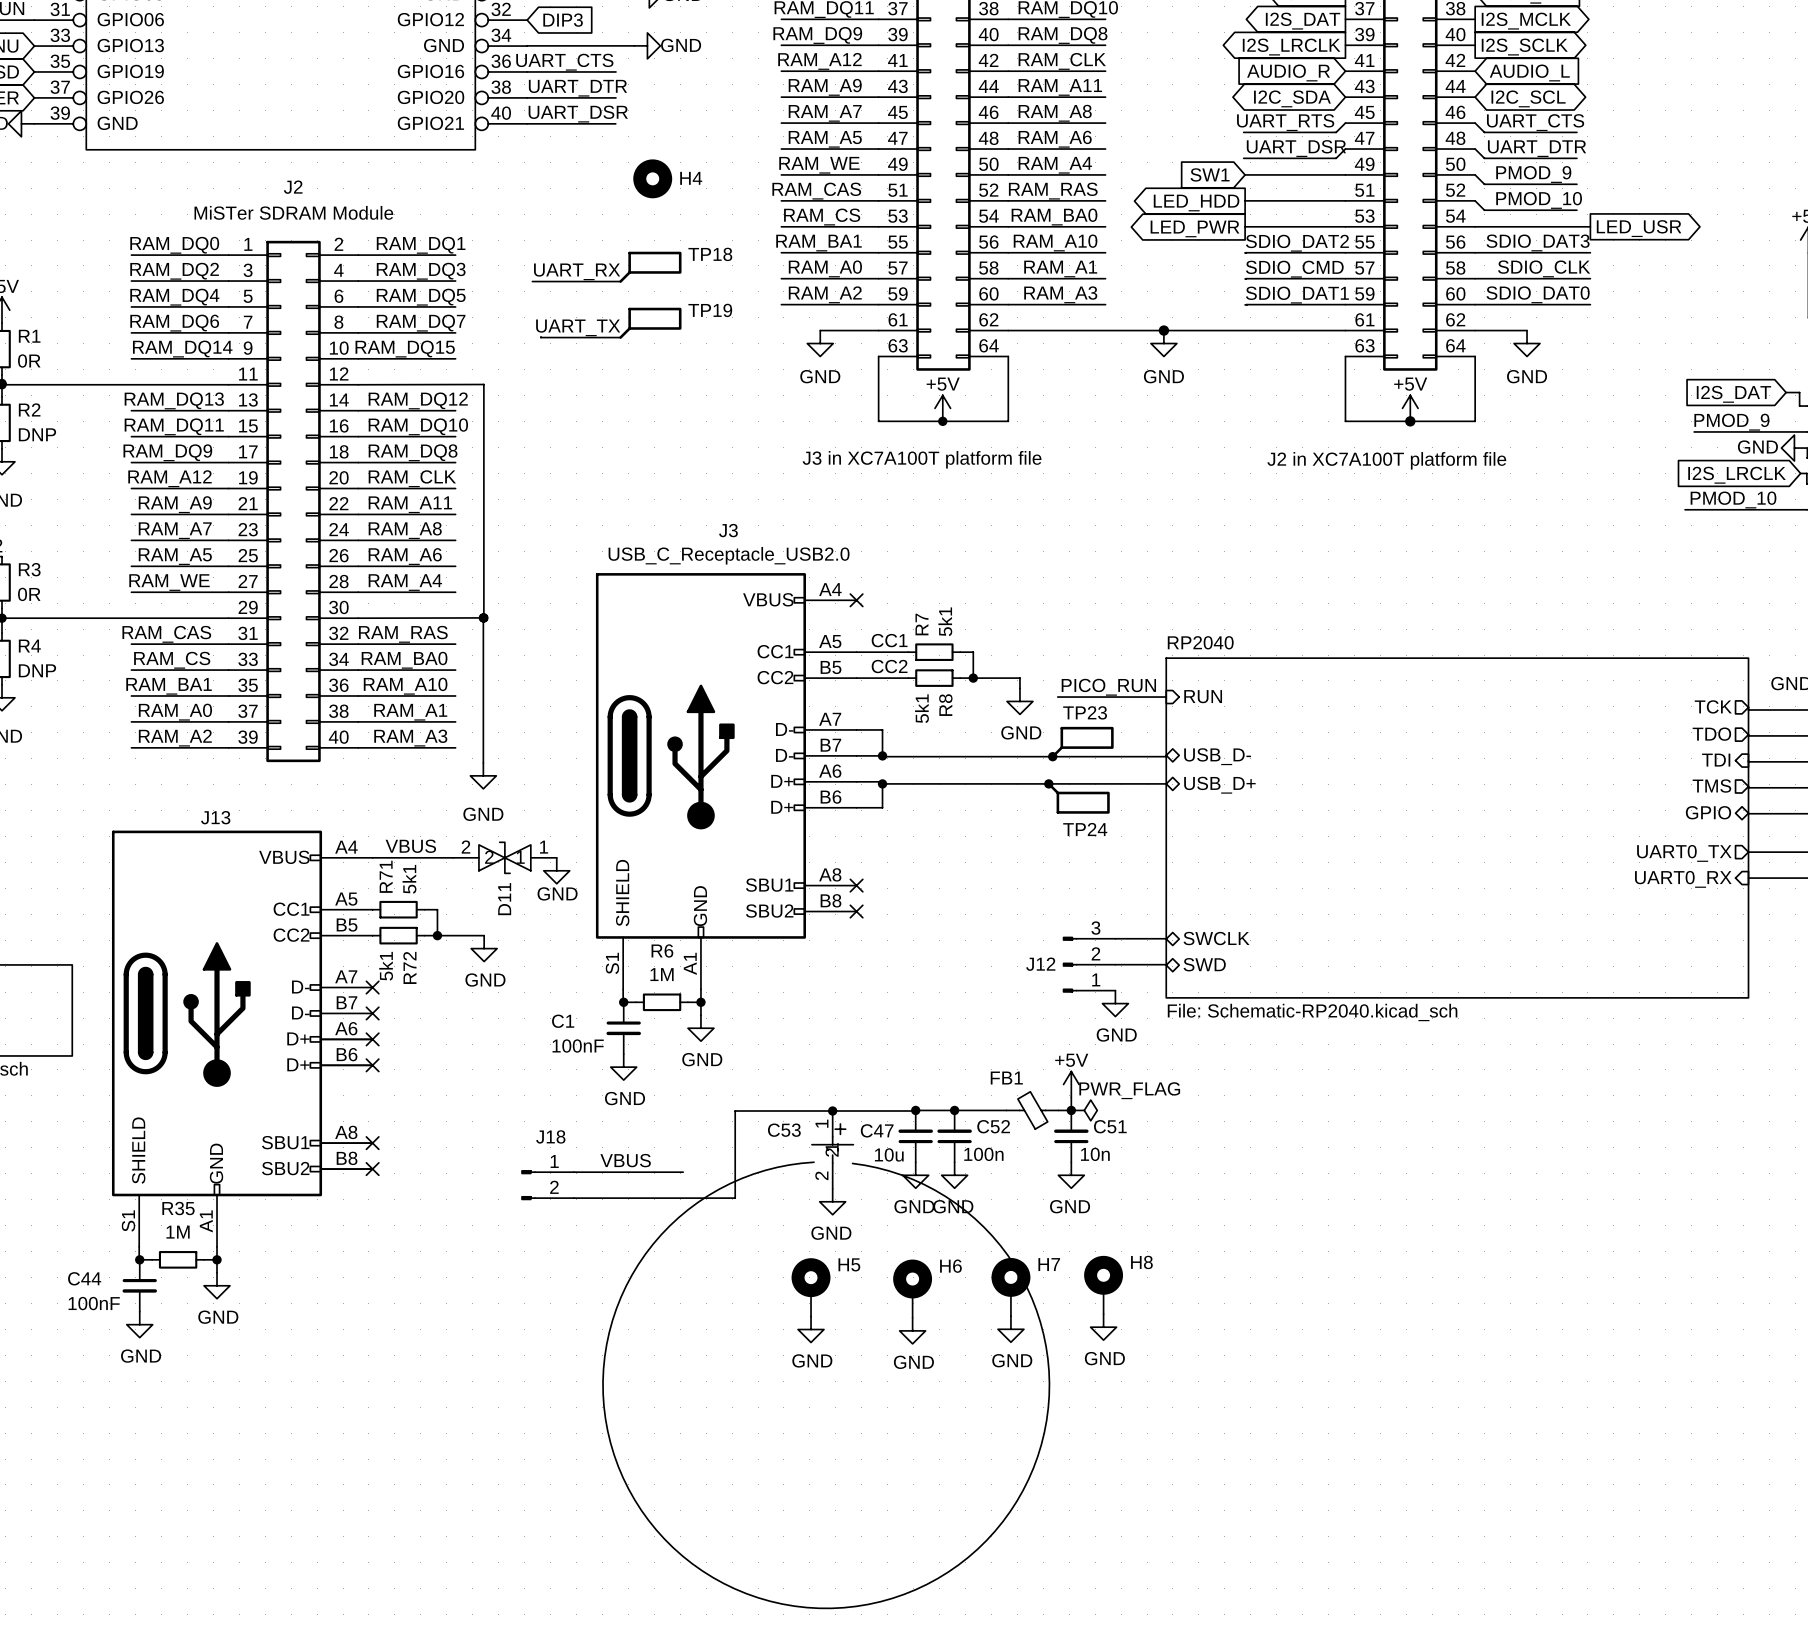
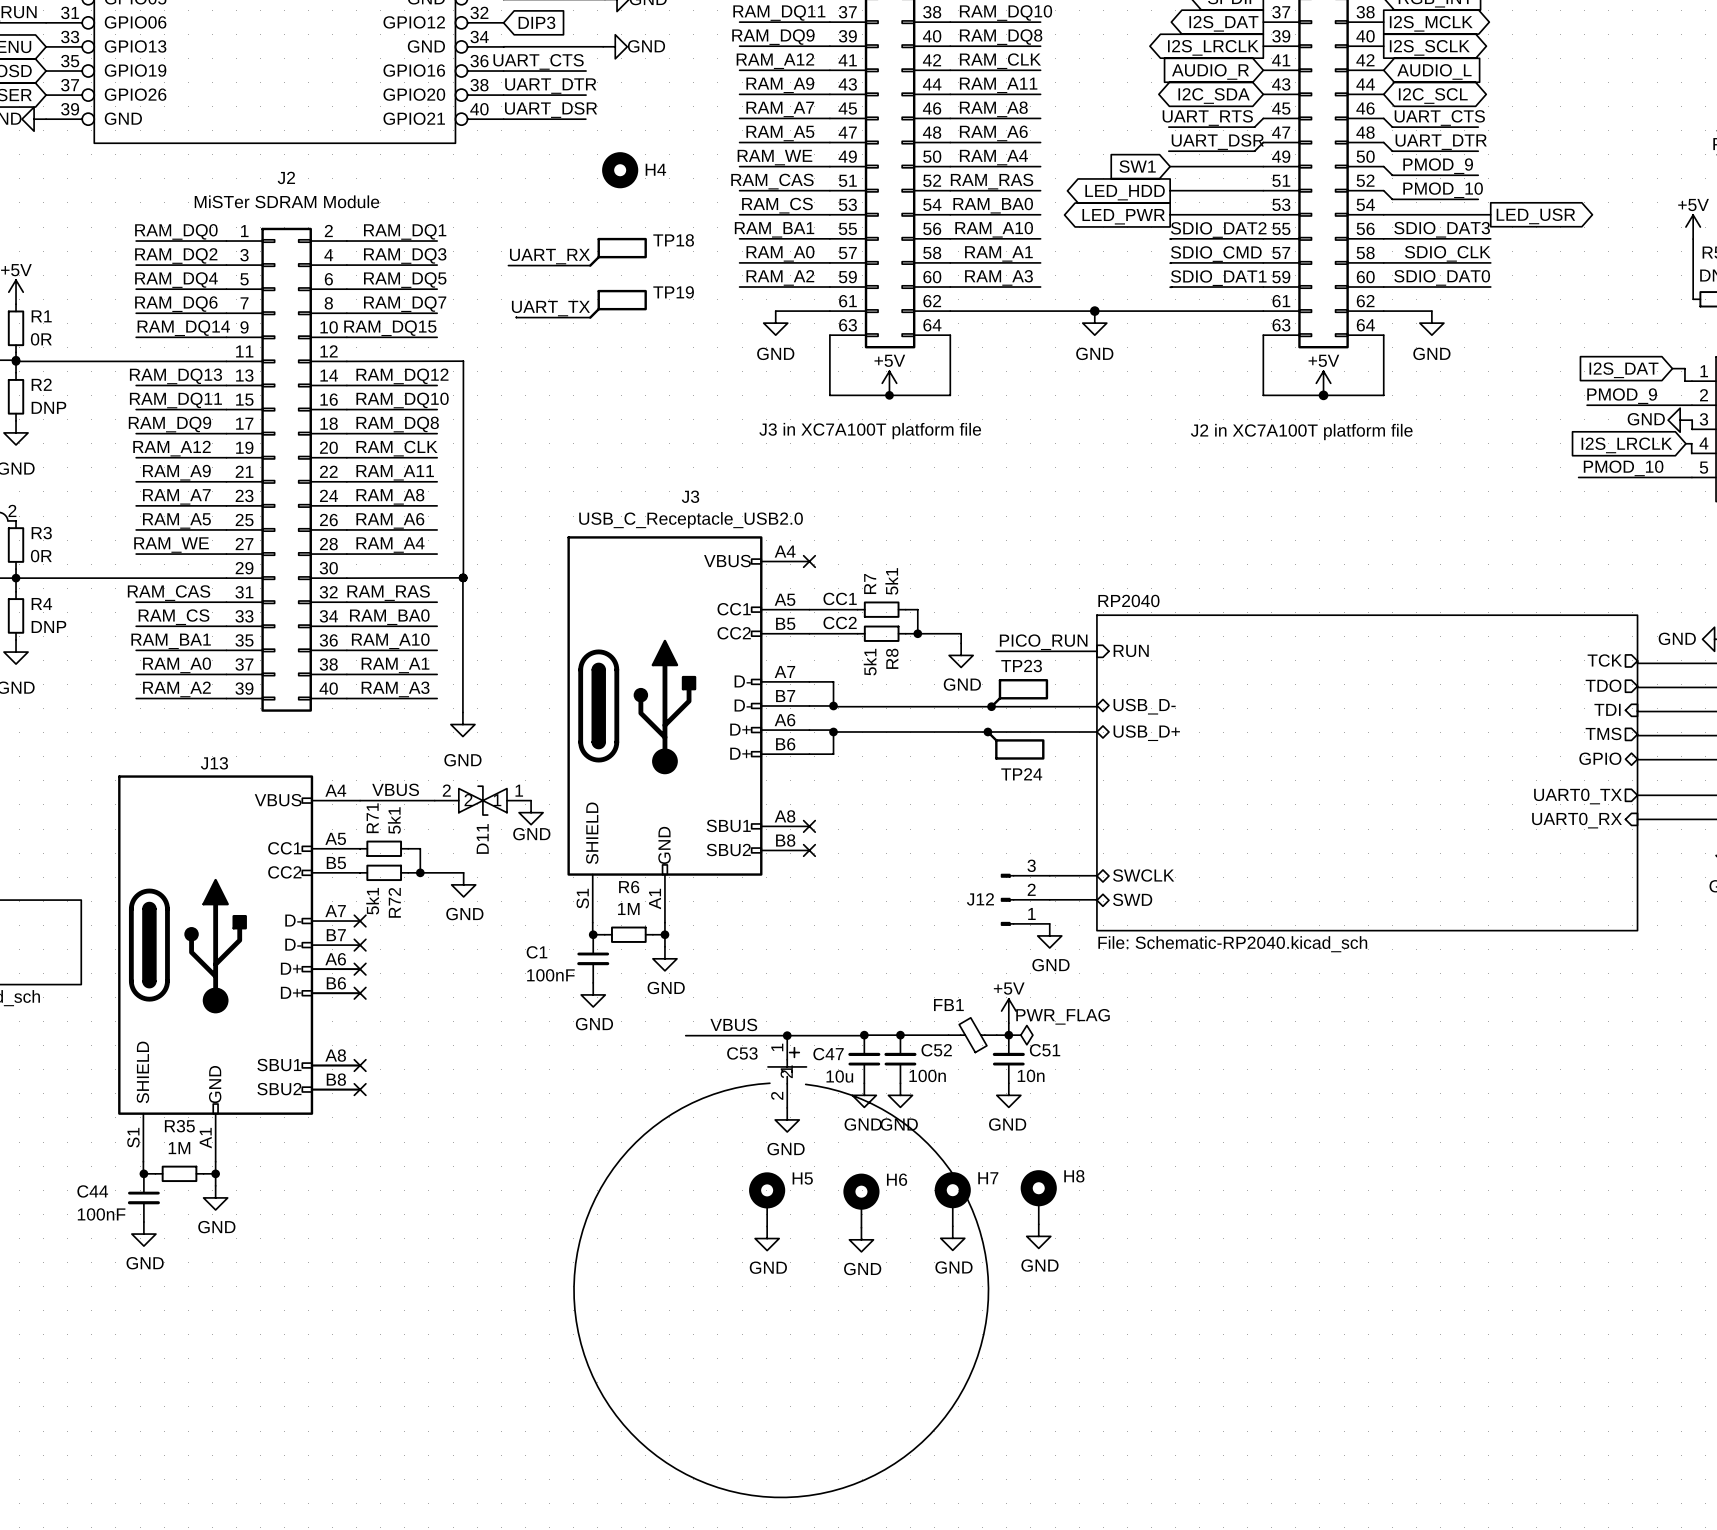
wire: (735, 1111) (735, 1198) (573, 1198) -> (696, 1035) (685, 1035)
label position: VBUS (625, 1160) -> VBUS (733, 1024)
wire: (573, 1172) (683, 1172) -> none
J18: (547, 1185) -> none

